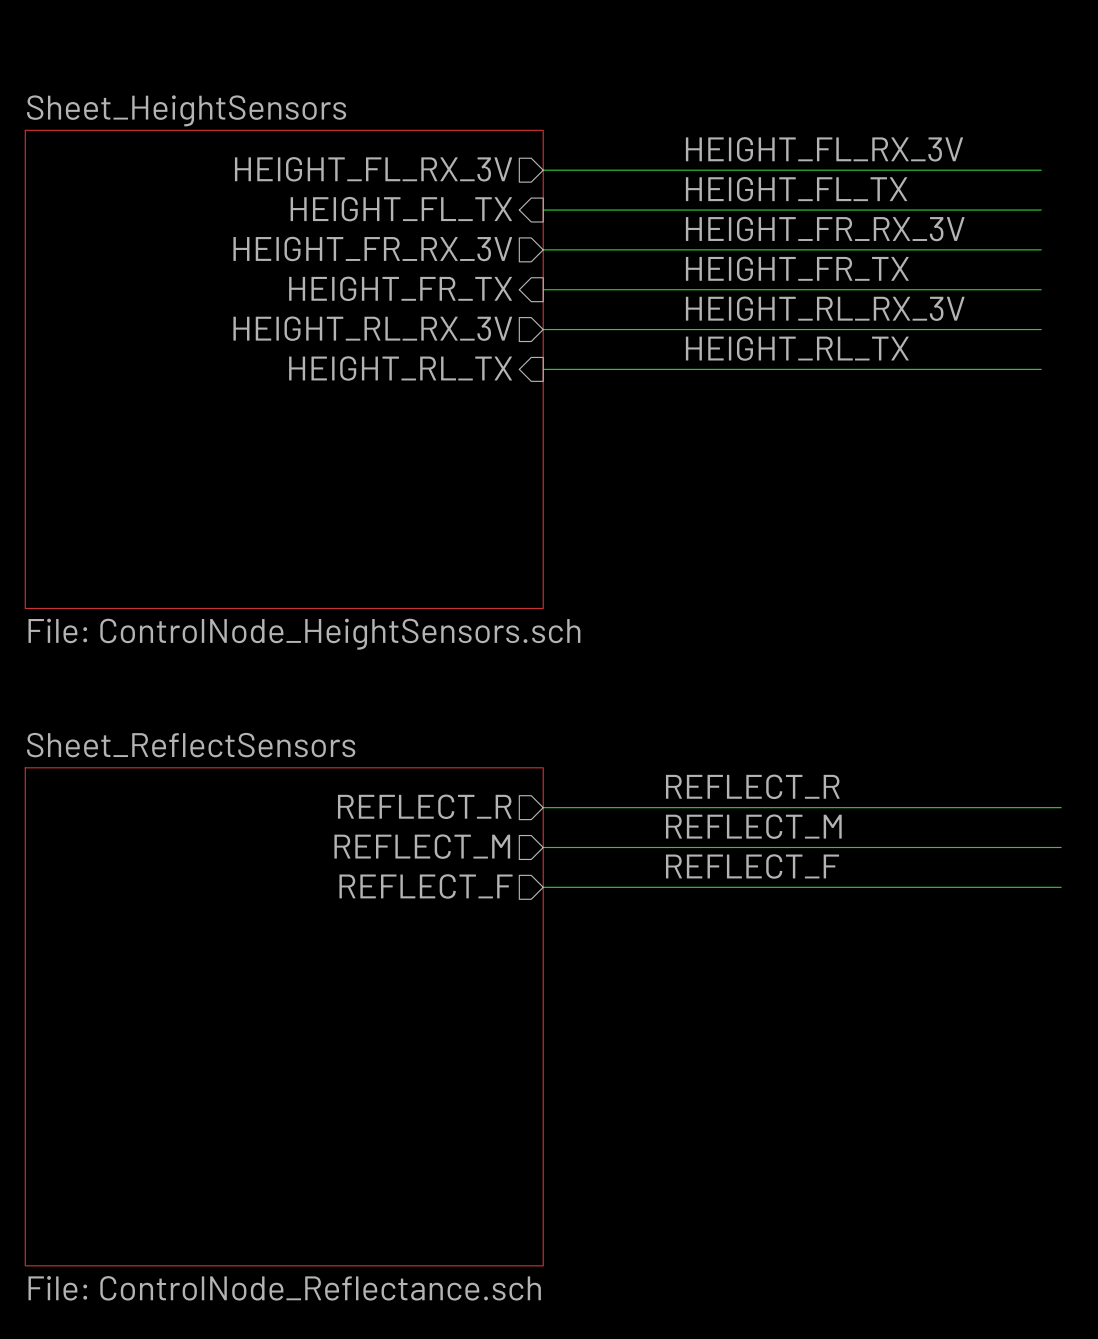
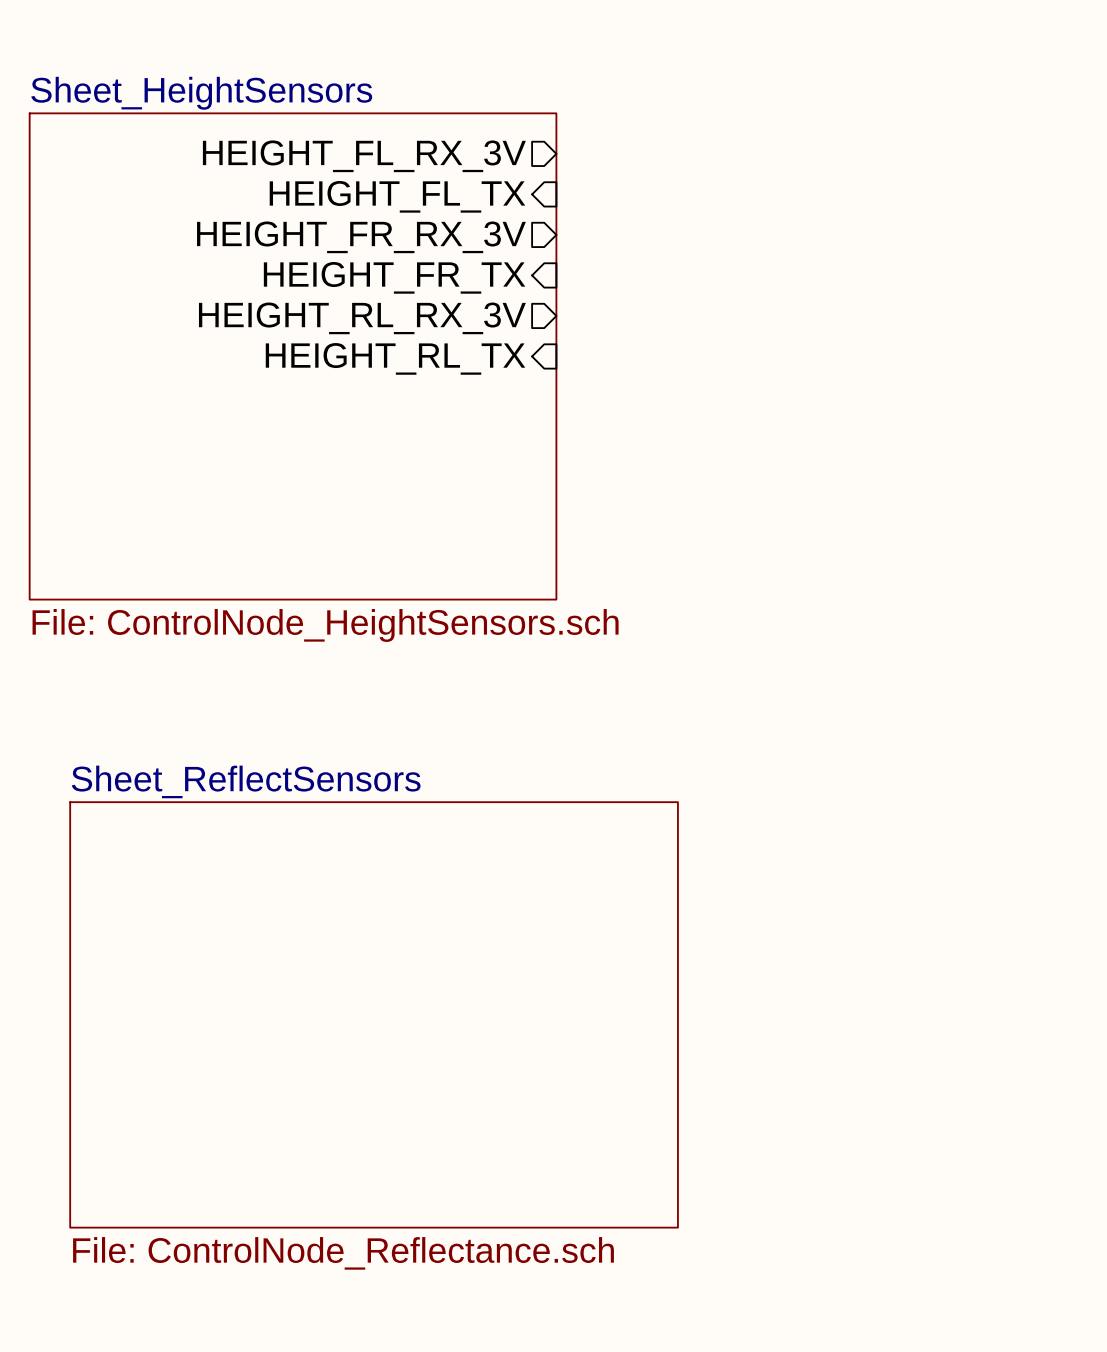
label: HEIGHT_FL_RX_3V (824, 149) -> none
wire: (543, 170) (1041, 170) -> none
label: HEIGHT_FL_TX (796, 189) -> none
wire: (543, 210) (1041, 210) -> none
label: HEIGHT_FR_RX_3V (825, 229) -> none
wire: (543, 249) (1041, 249) -> none
label: HEIGHT_FR_TX (797, 268) -> none
wire: (543, 289) (1041, 289) -> none
label: HEIGHT_RL_RX_3V (825, 308) -> none
wire: (543, 329) (1041, 329) -> none
label: HEIGHT_RL_TX (797, 348) -> none
wire: (543, 369) (1041, 369) -> none
label: REFLECT_R (752, 786) -> none
sheet pin: REFLECT_R (424, 806) -> none
wire: (543, 807) (1061, 807) -> none
label: REFLECT_M (753, 826) -> none
sheet pin: REFLECT_M (422, 846) -> none
wire: (543, 847) (1061, 847) -> none
label: REFLECT_F (752, 866) -> none
sheet pin: REFLECT_F (426, 886) -> none
wire: (543, 887) (1061, 887) -> none
sheet Sheet_ReflectSensors: File: ControlNode_Reflectance.sch (284, 1016) -> none
sheet Sheet_ReflectSensors: none -> File: ControlNode_Reflectance.sch (374, 1014)

